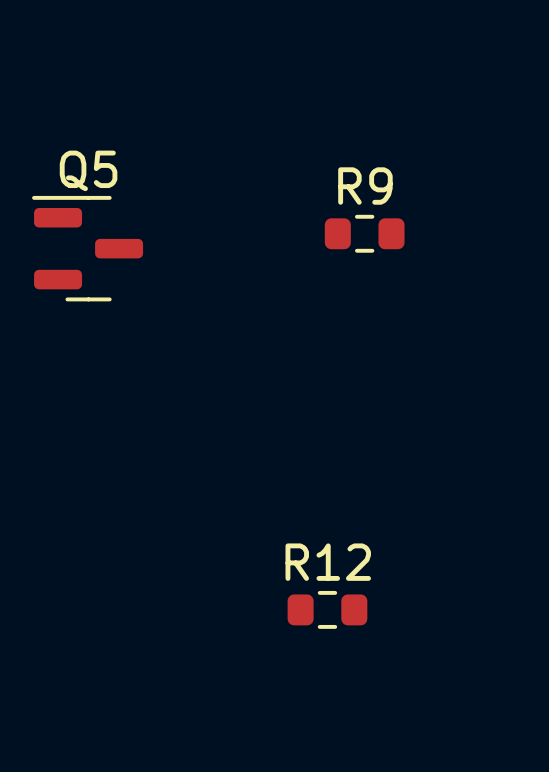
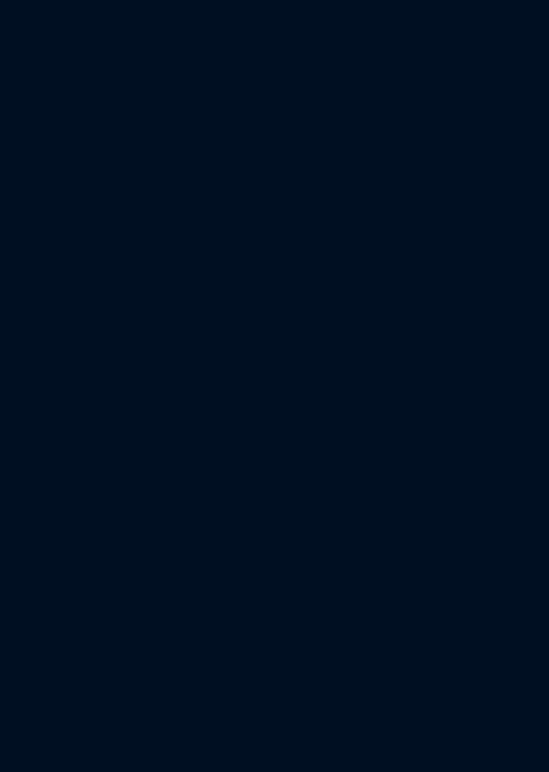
R9: (364, 233) -> none
Q5: (87, 248) -> none
R12: (327, 609) -> none

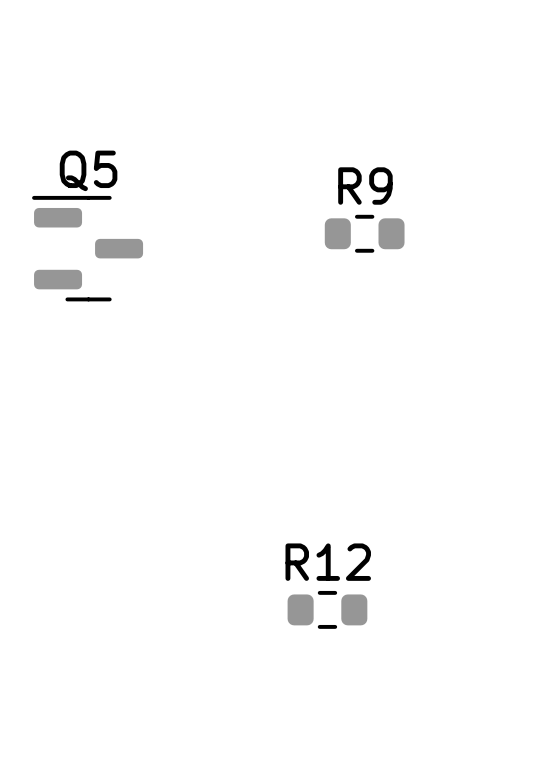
R9: none -> (364, 233)
Q5: none -> (87, 248)
R12: none -> (327, 609)

